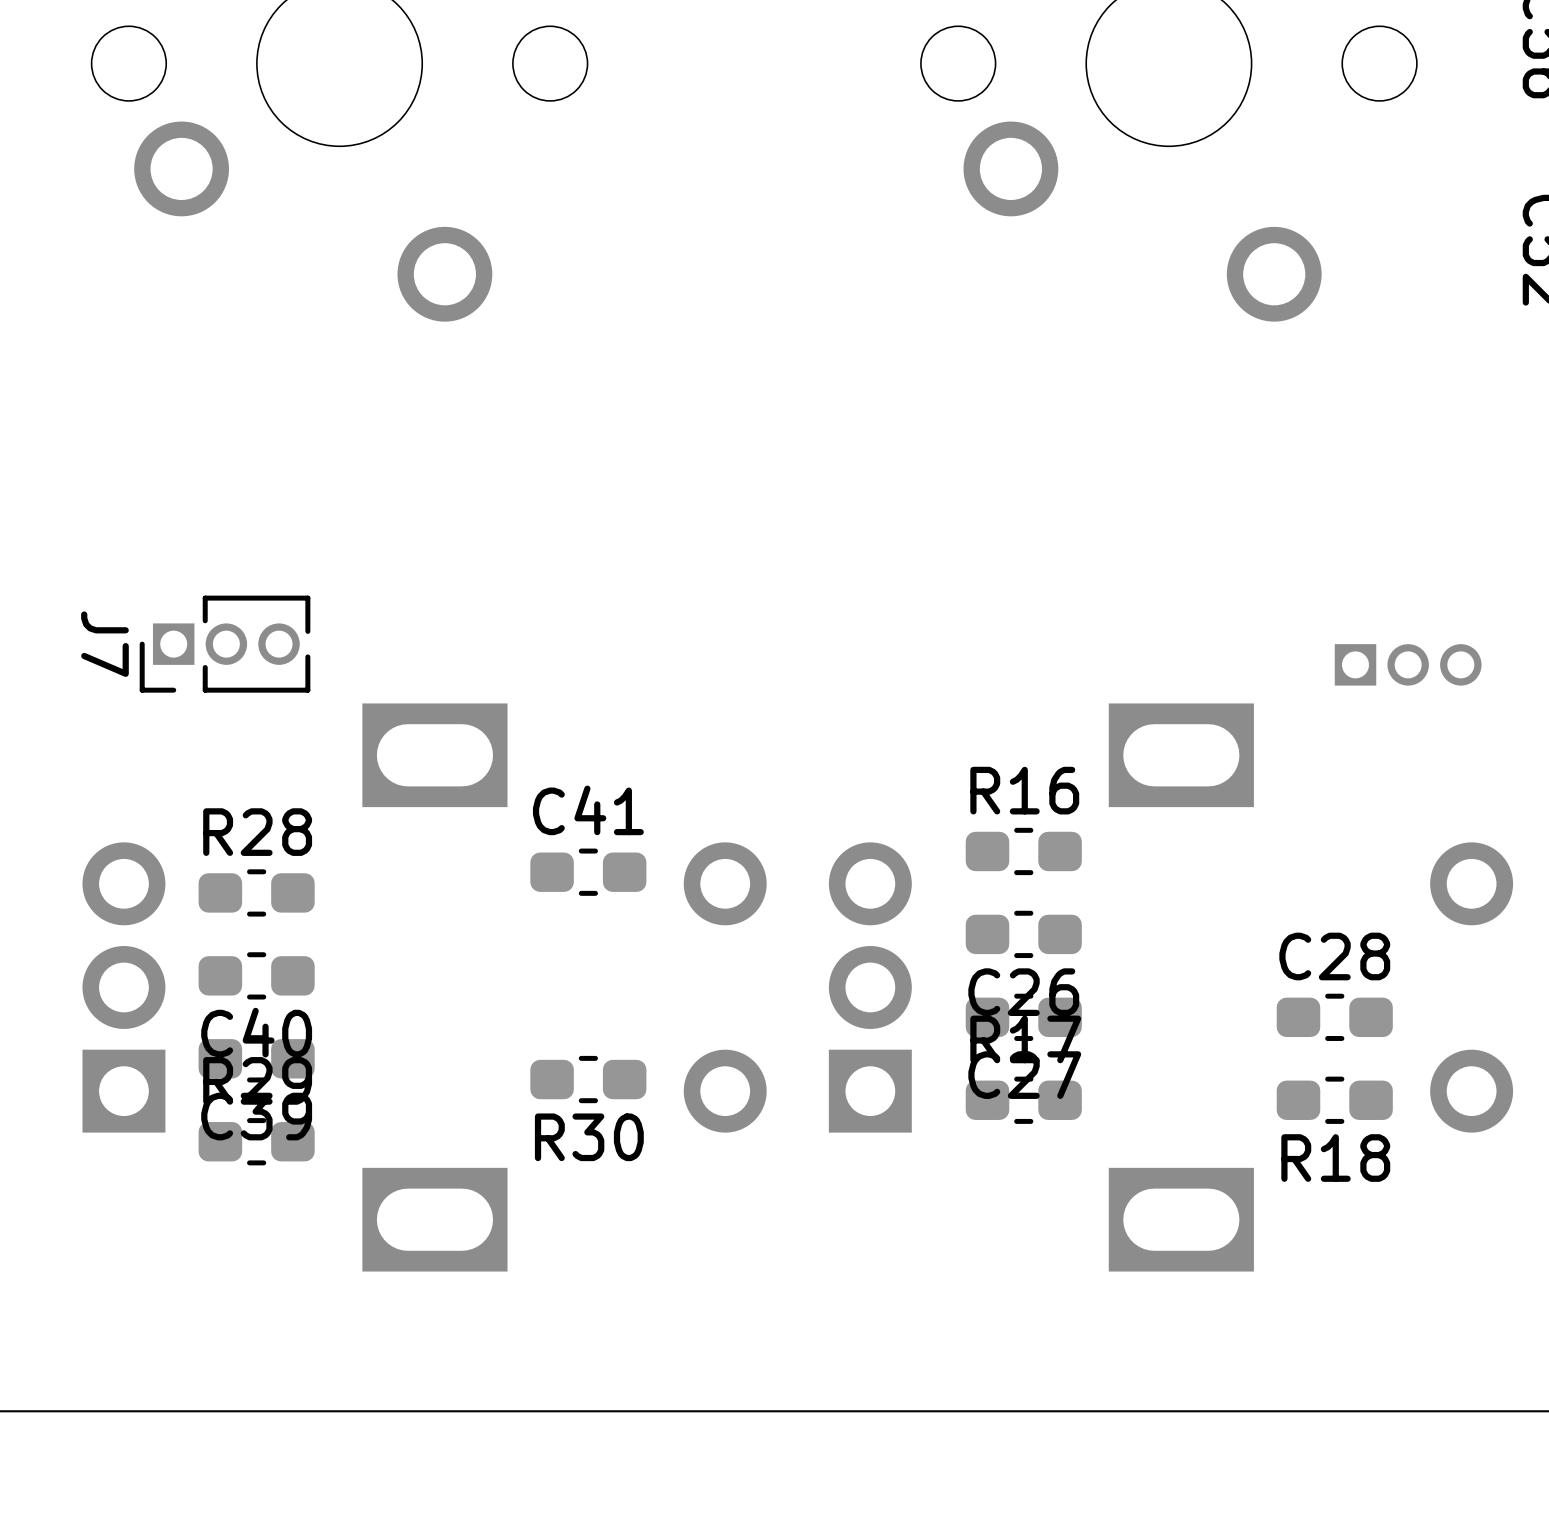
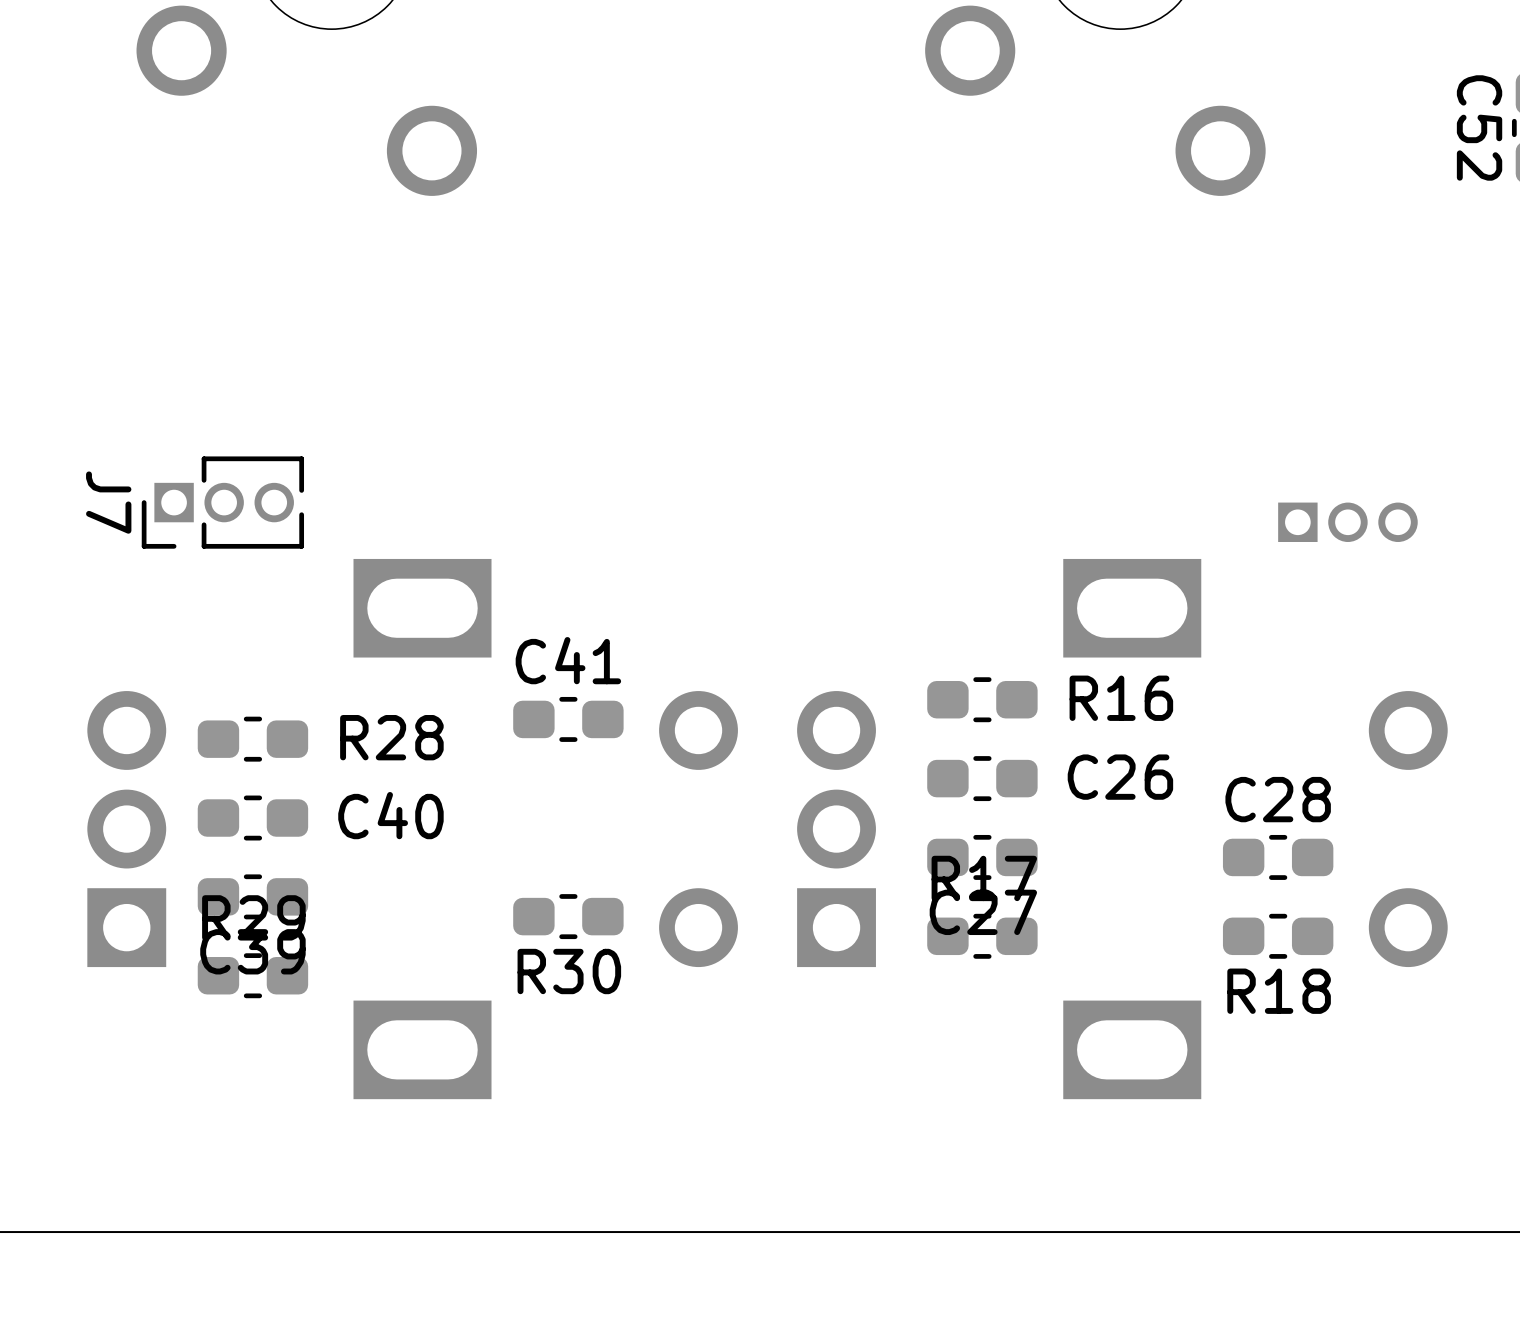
R16 name position: R16 (1024, 790) -> R16 (1121, 698)
R28 name position: R28 (257, 832) -> R28 (391, 737)
C26 name position: C26 (1023, 992) -> C26 (1120, 777)
C40 name position: C40 (256, 1032) -> C40 (390, 815)

